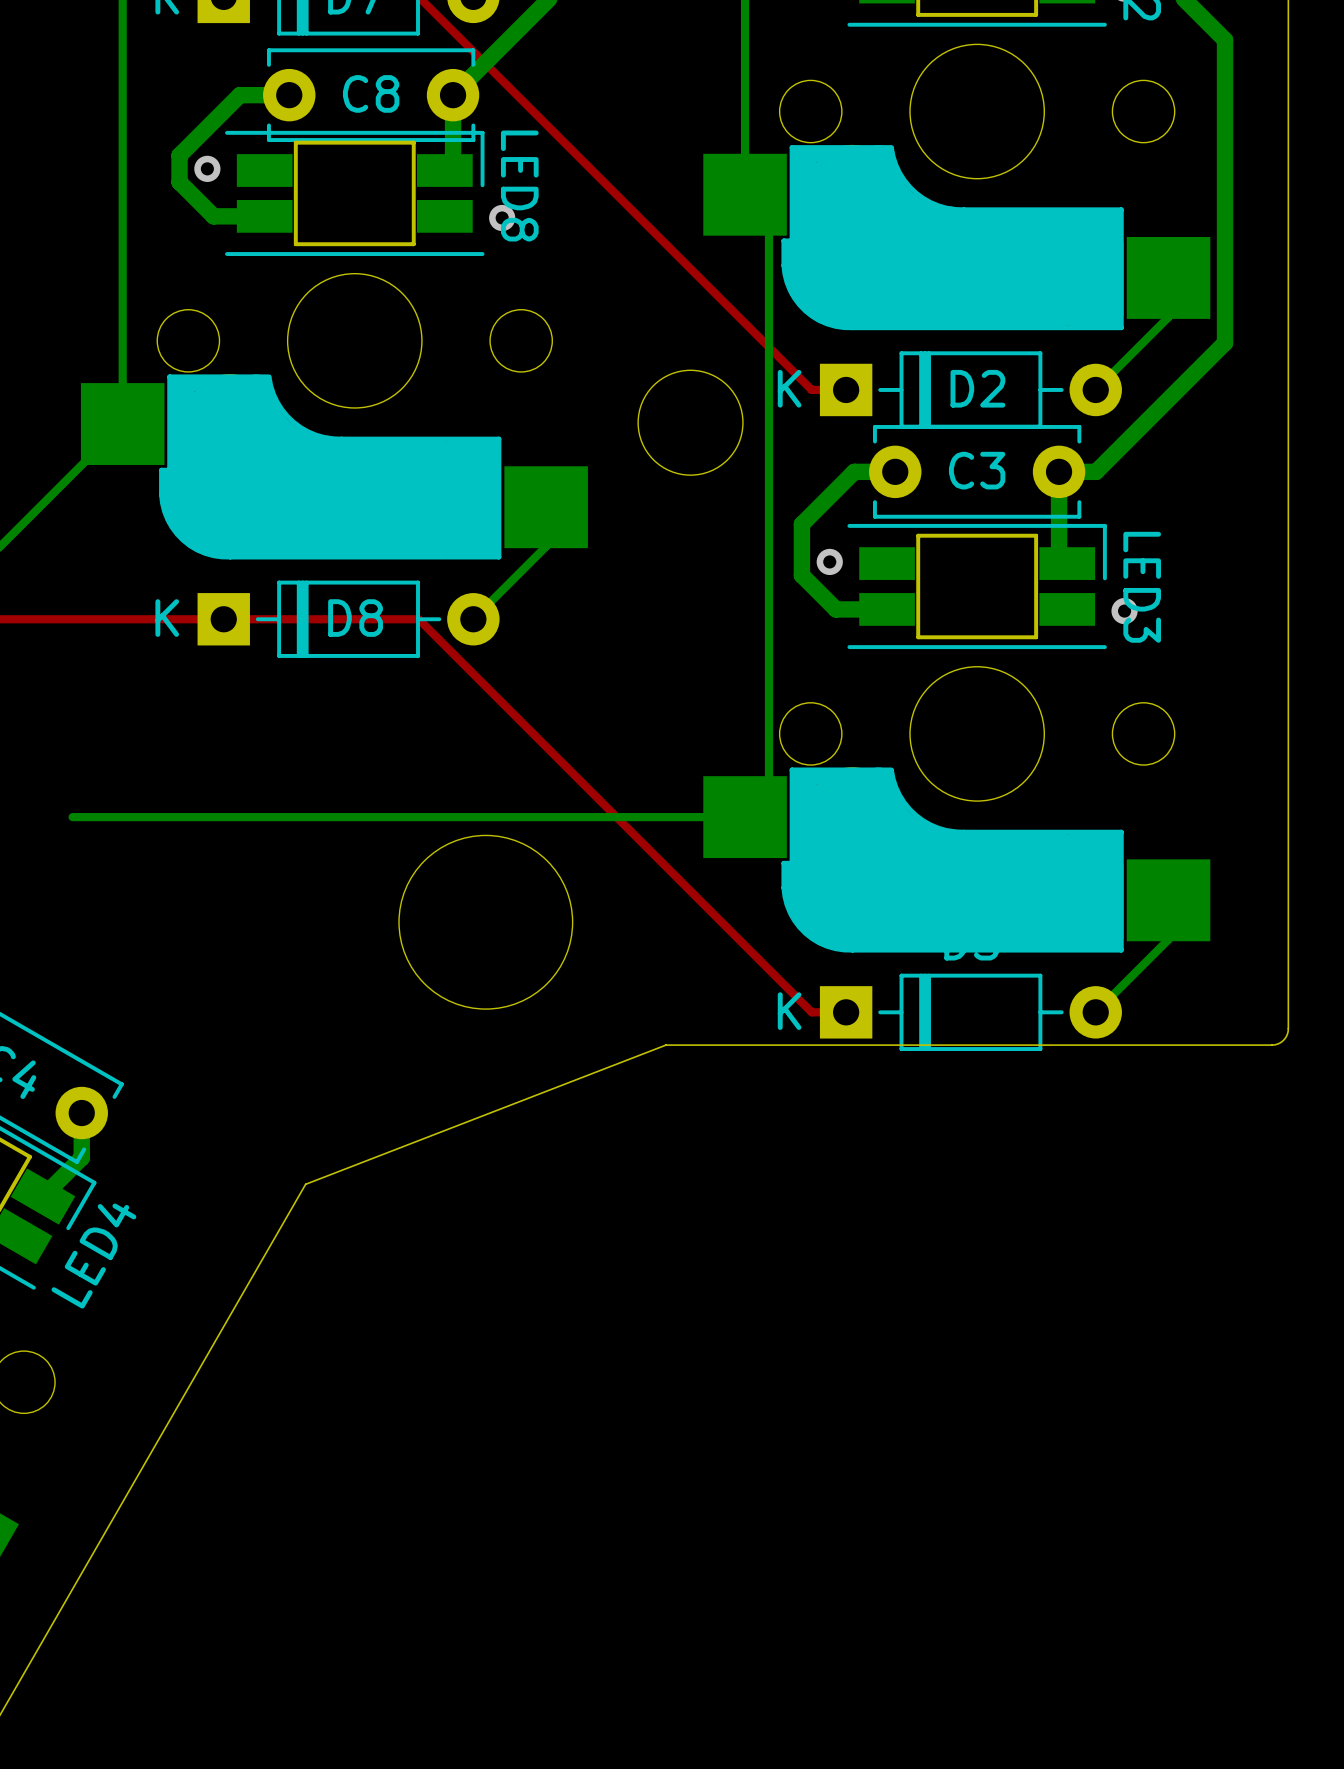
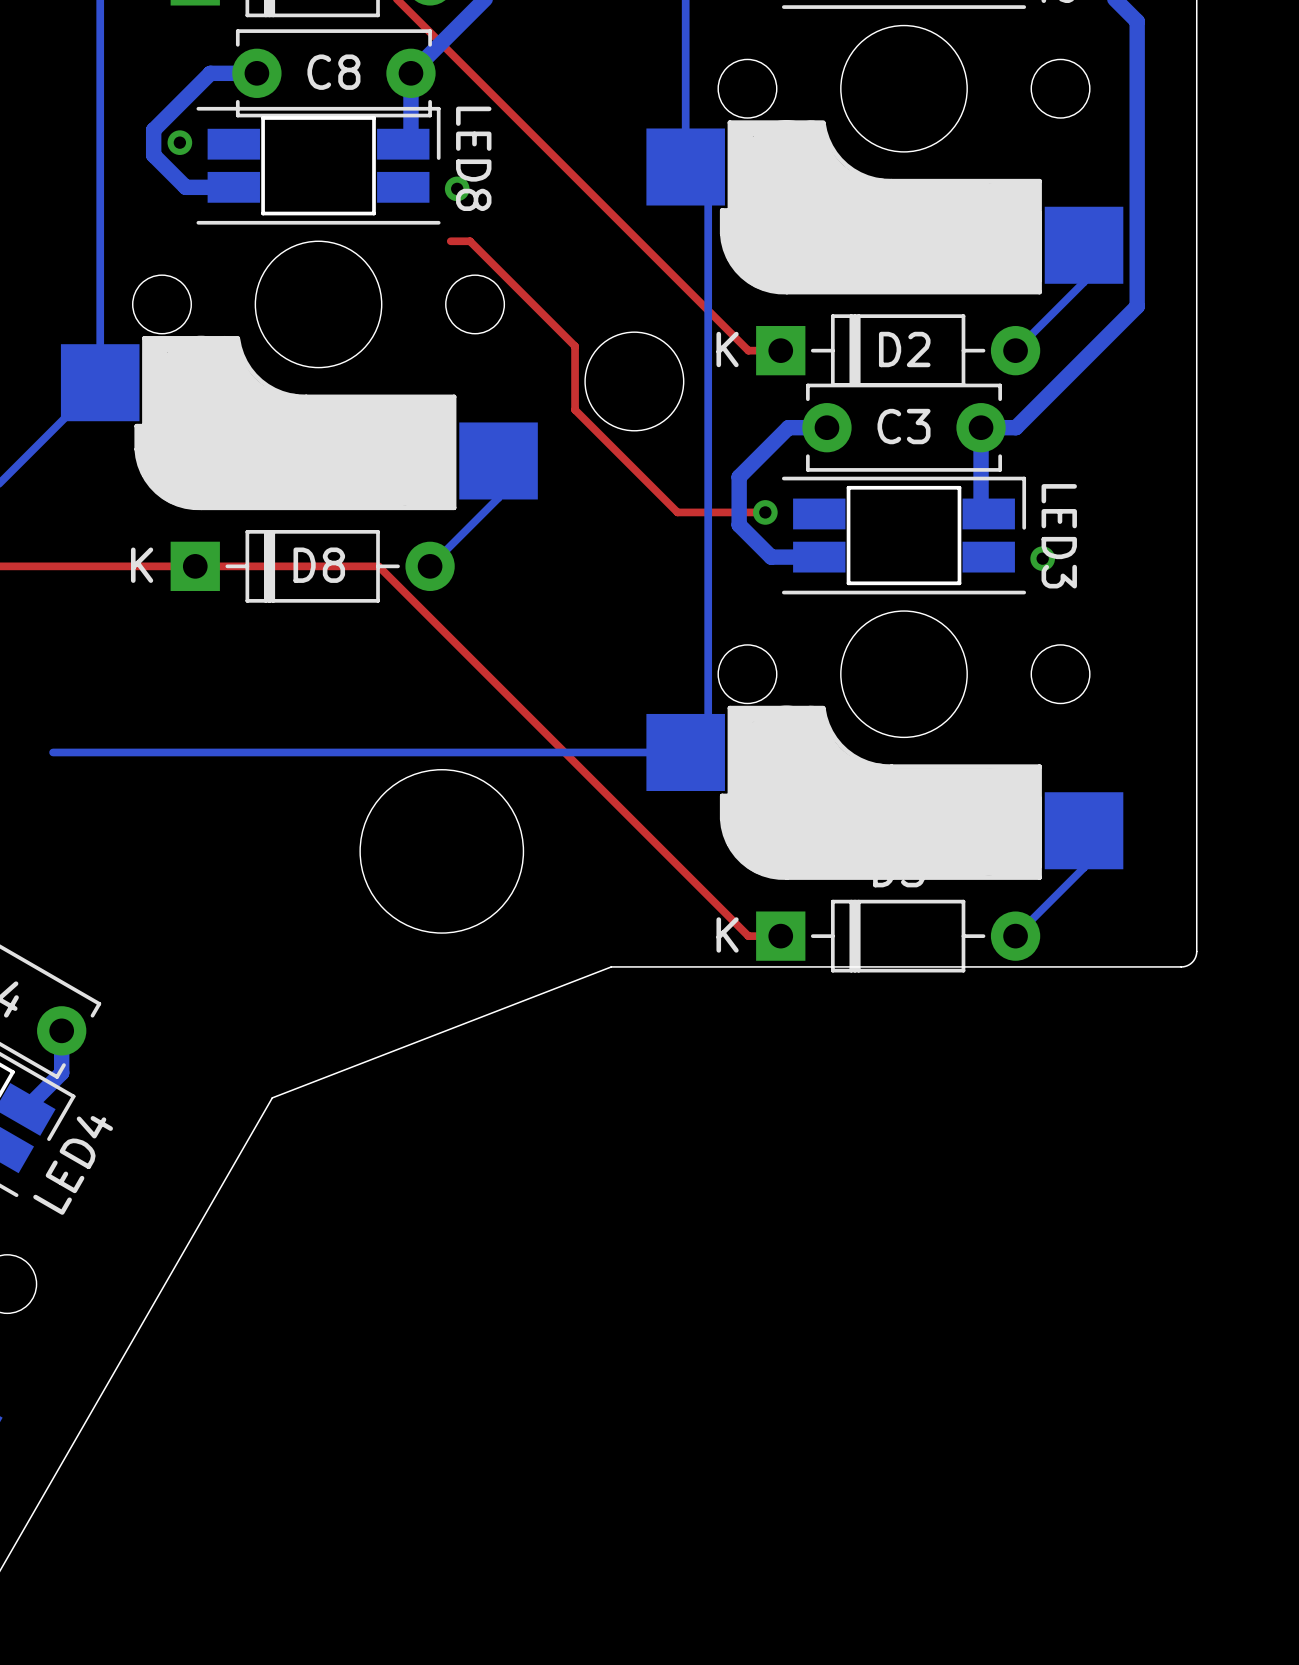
top track: none -> (450, 241) (470, 241) (575, 346) (575, 409) (677, 512) (773, 512)

